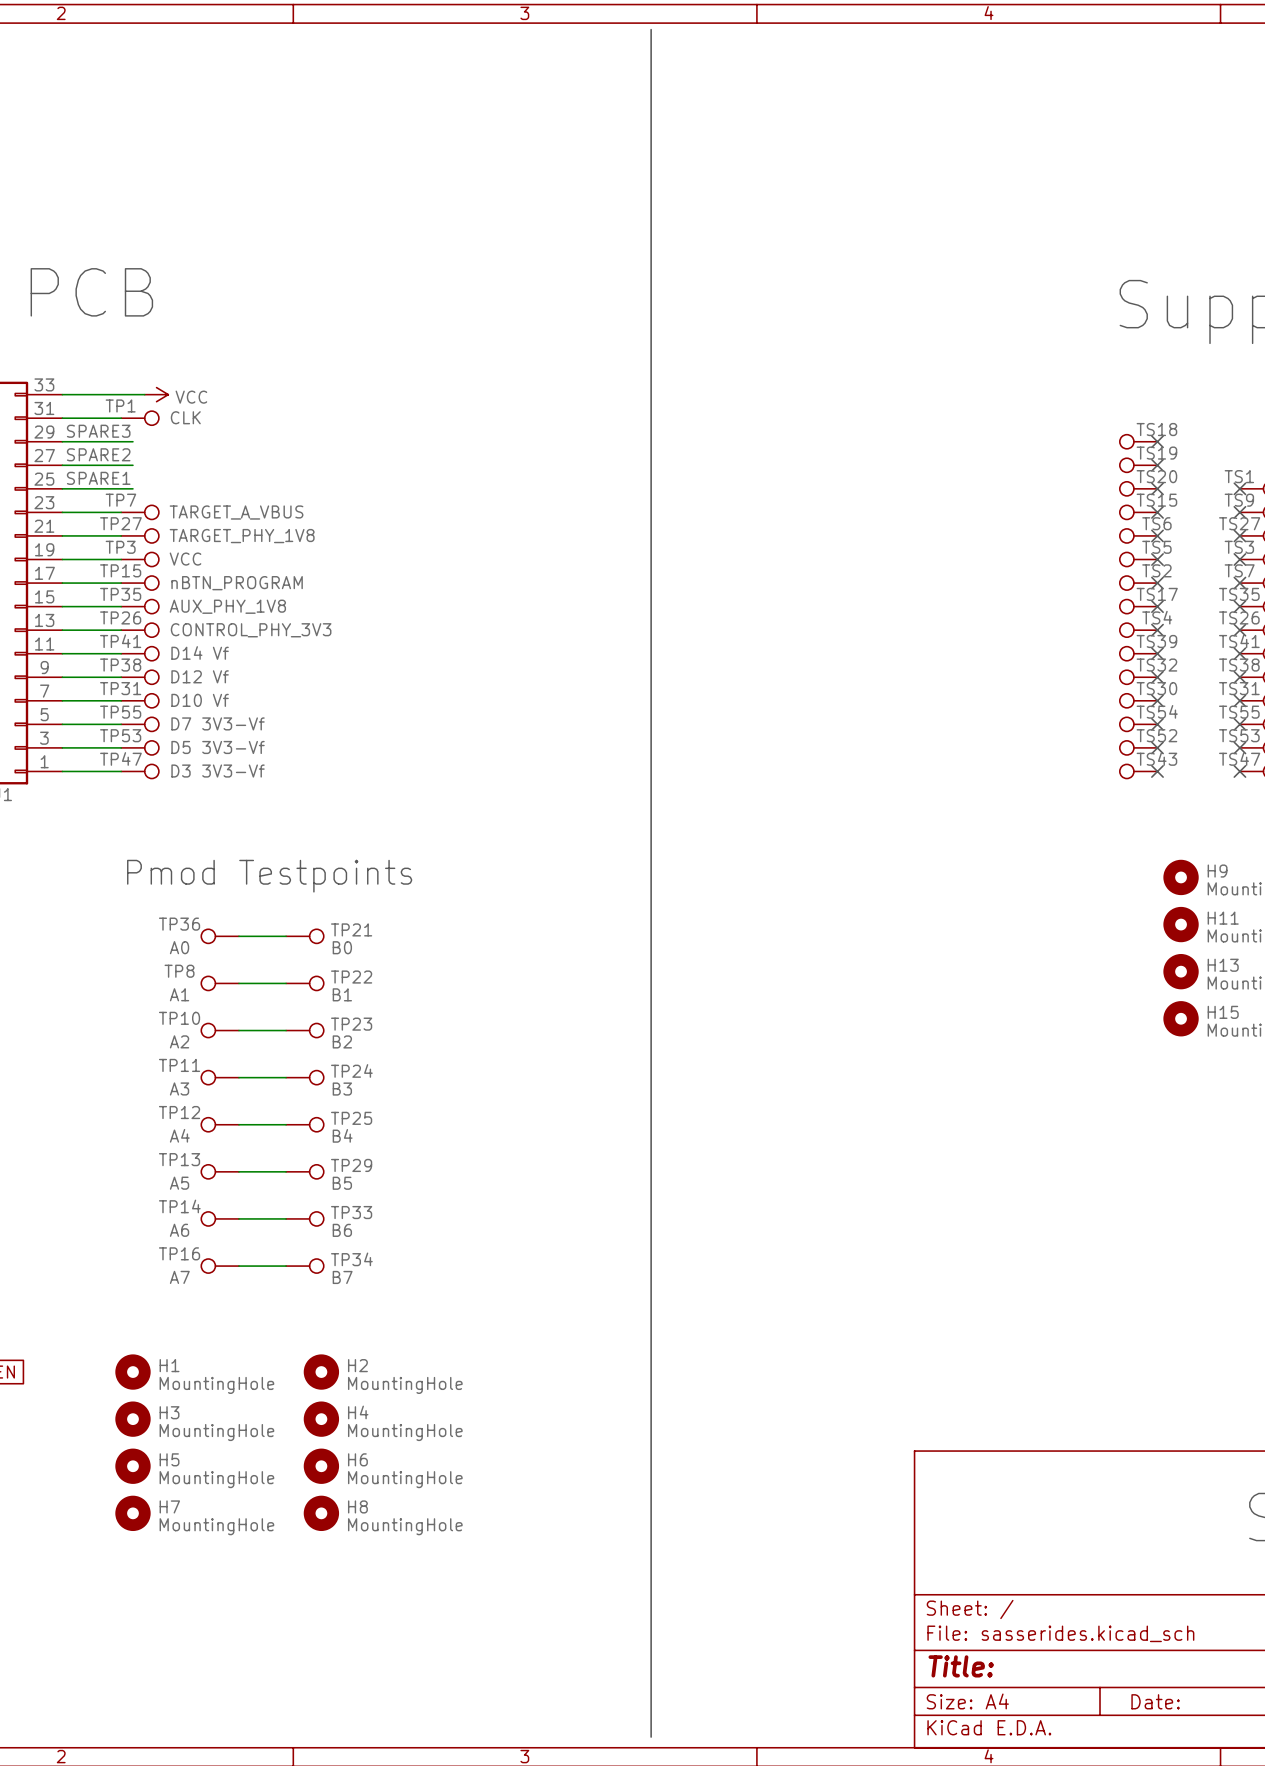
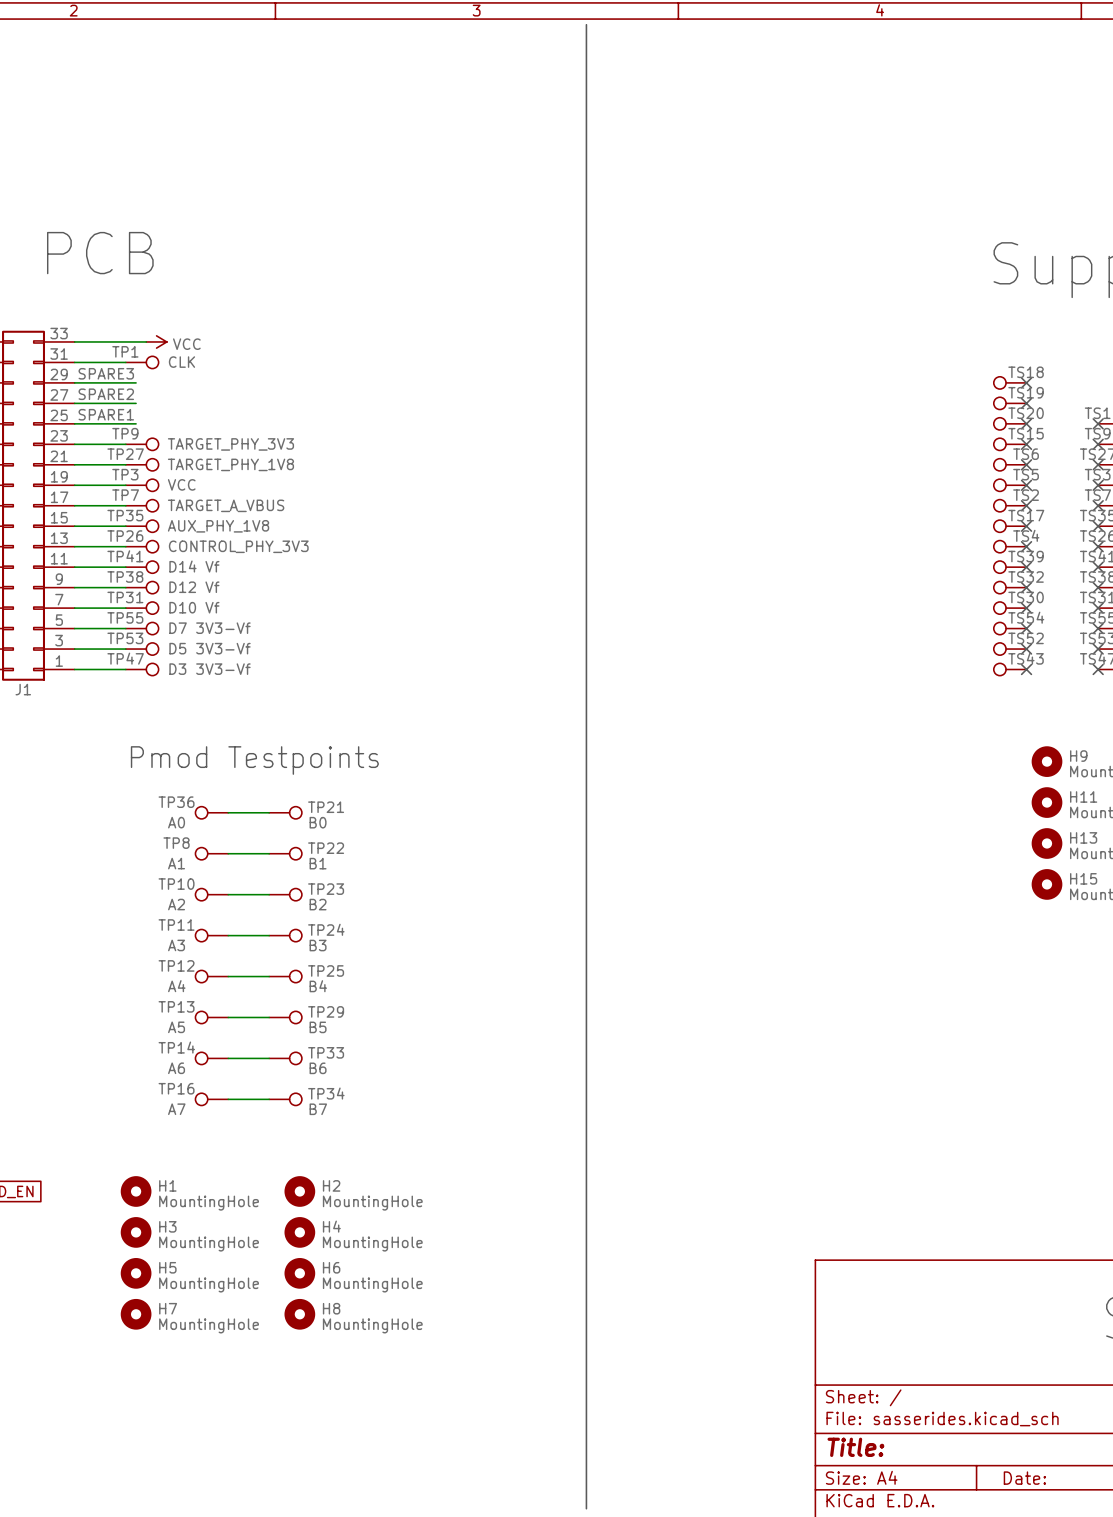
TP7 name: TP7 (120, 500) -> TP9 (125, 433)
TP7 value: TARGET_A_VBUS (236, 512) -> TARGET_PHY_3V3 (230, 444)
TP15 name: TP15 (120, 570) -> TP7 (125, 495)
TP15 value: nBTN_PROGRAM (237, 583) -> TARGET_A_VBUS (226, 505)

